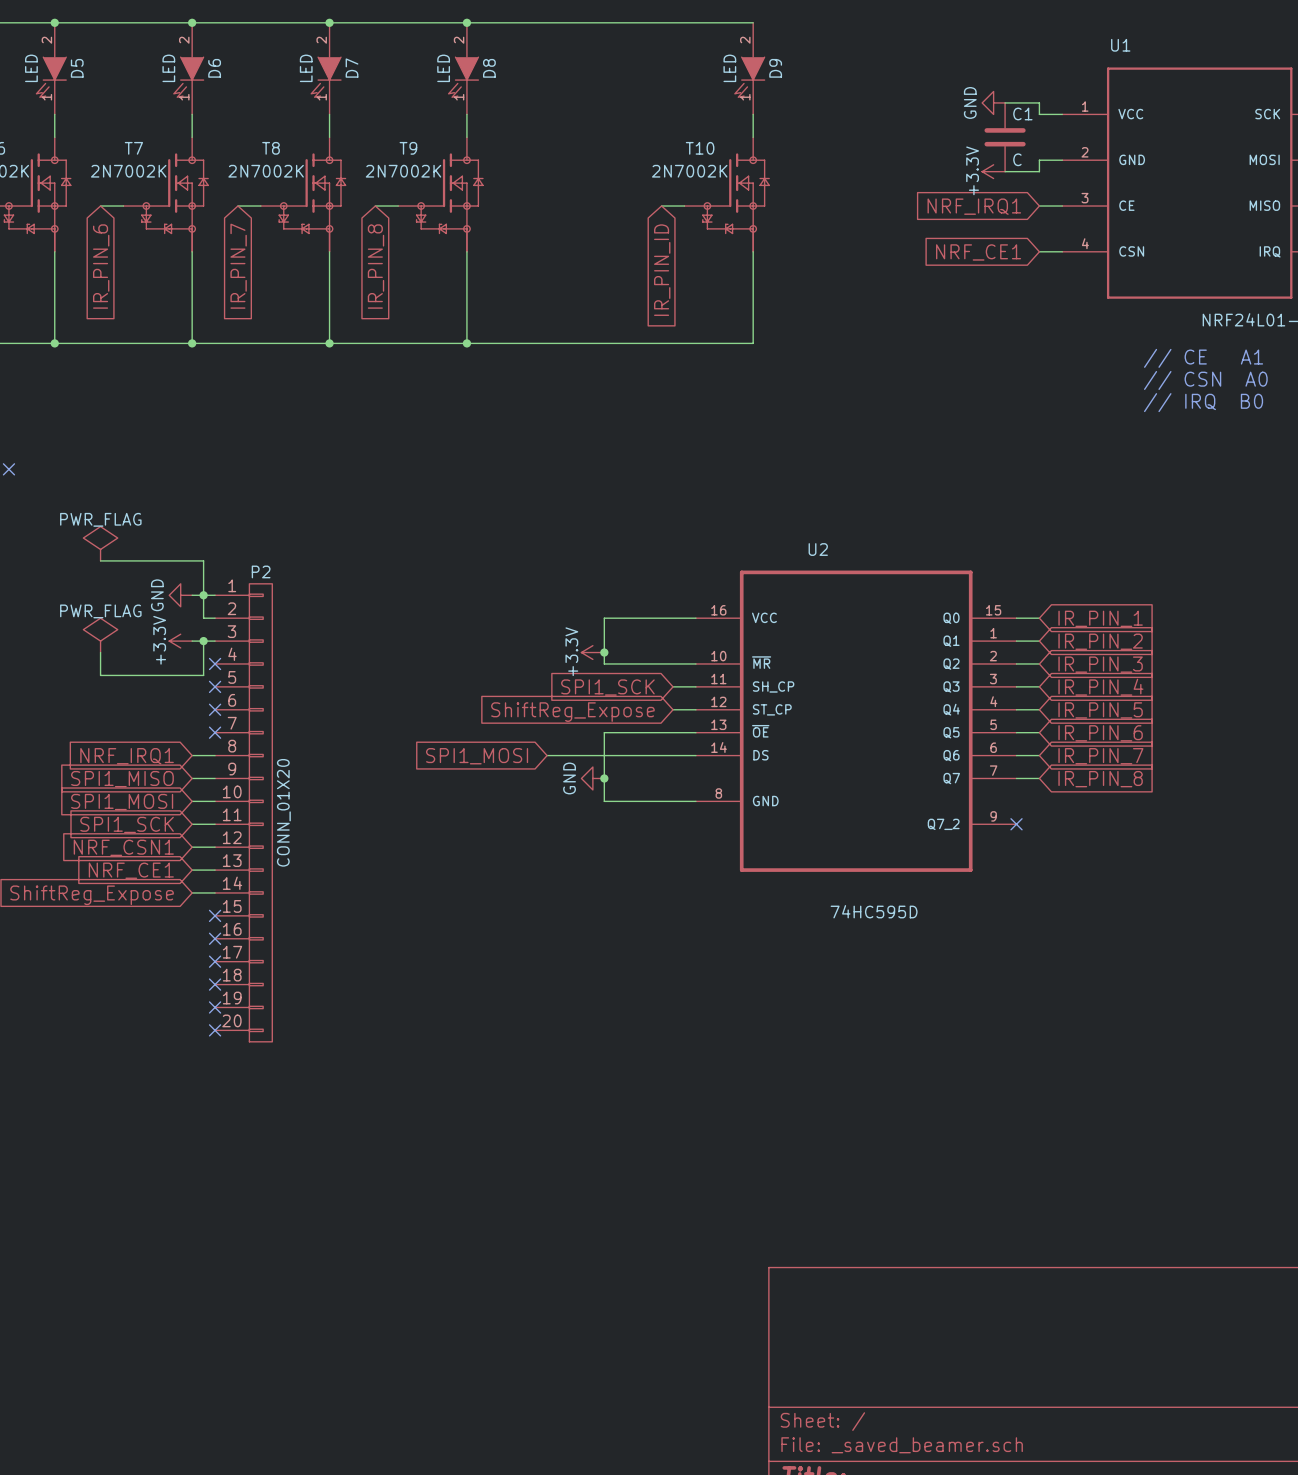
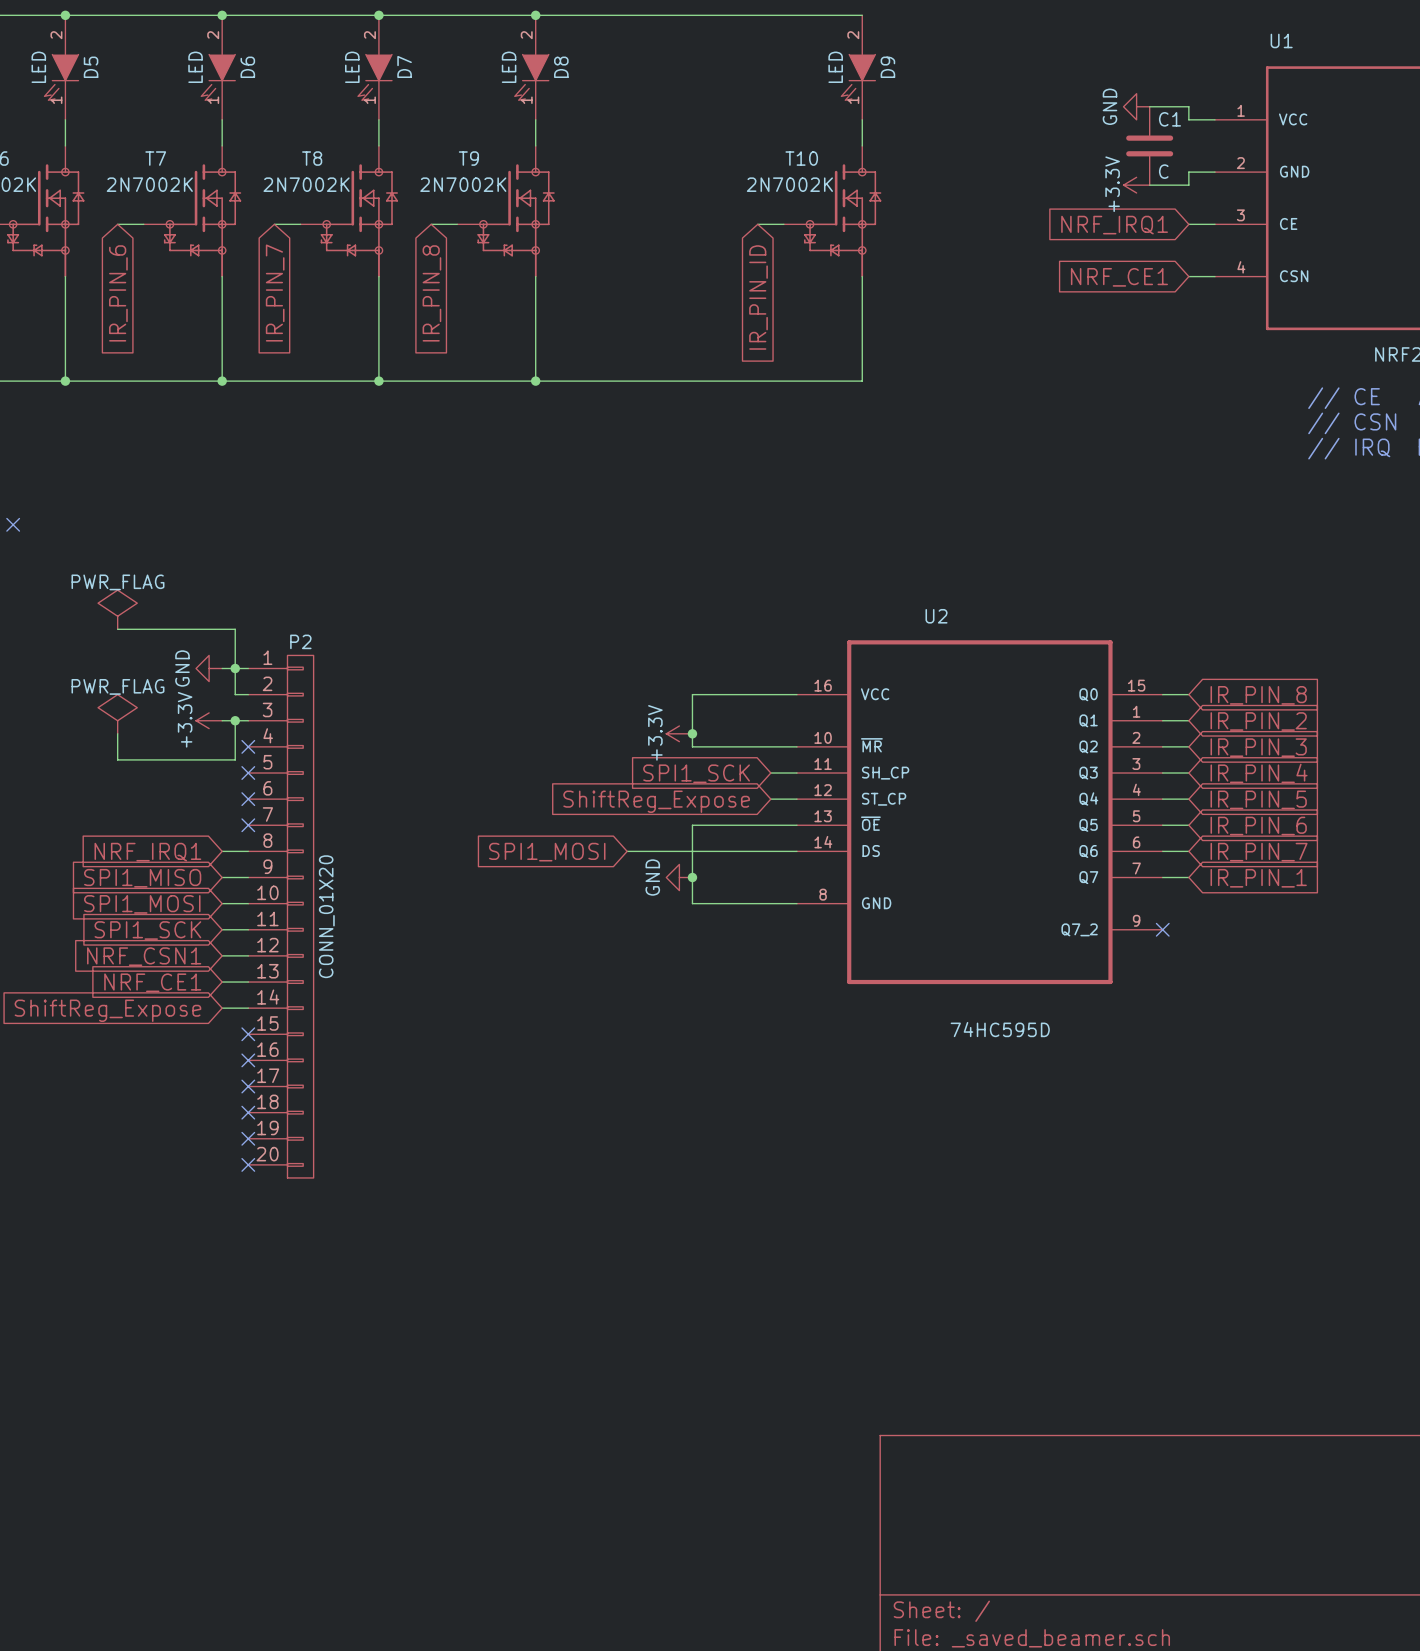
global label: IR_PIN_1 (1100, 618) -> IR_PIN_8 (1258, 695)
global label: IR_PIN_8 (1100, 779) -> IR_PIN_1 (1258, 878)

